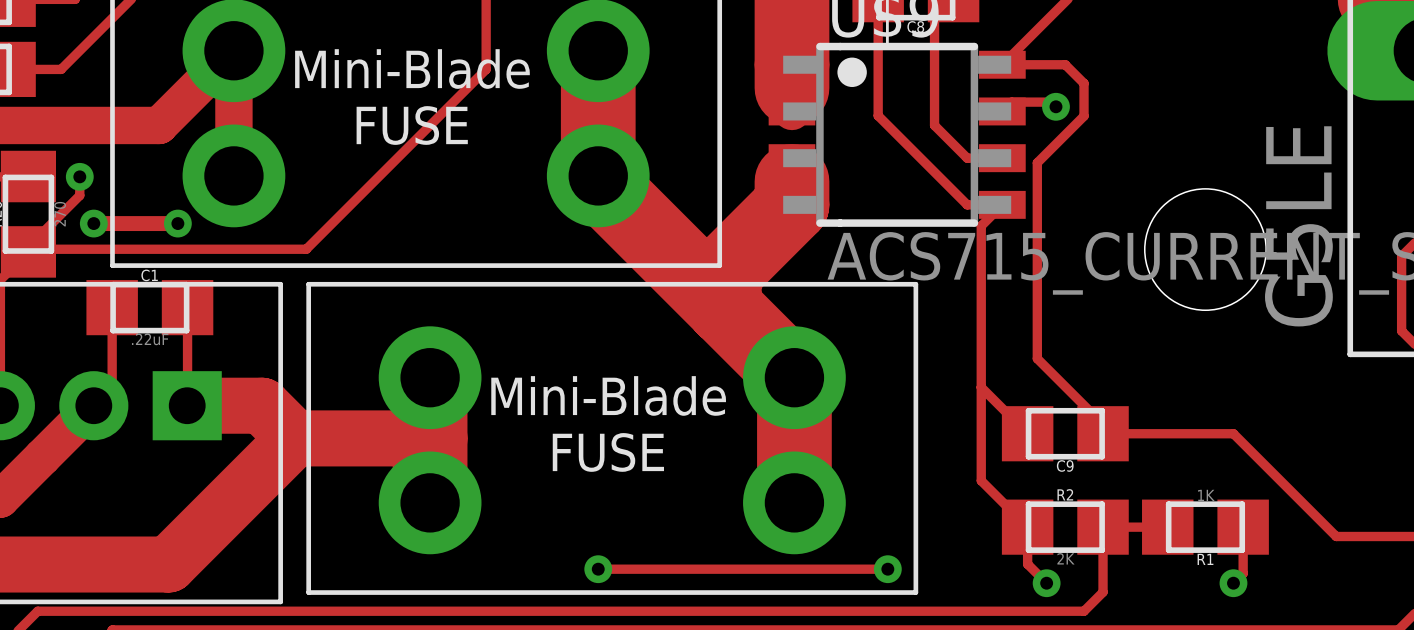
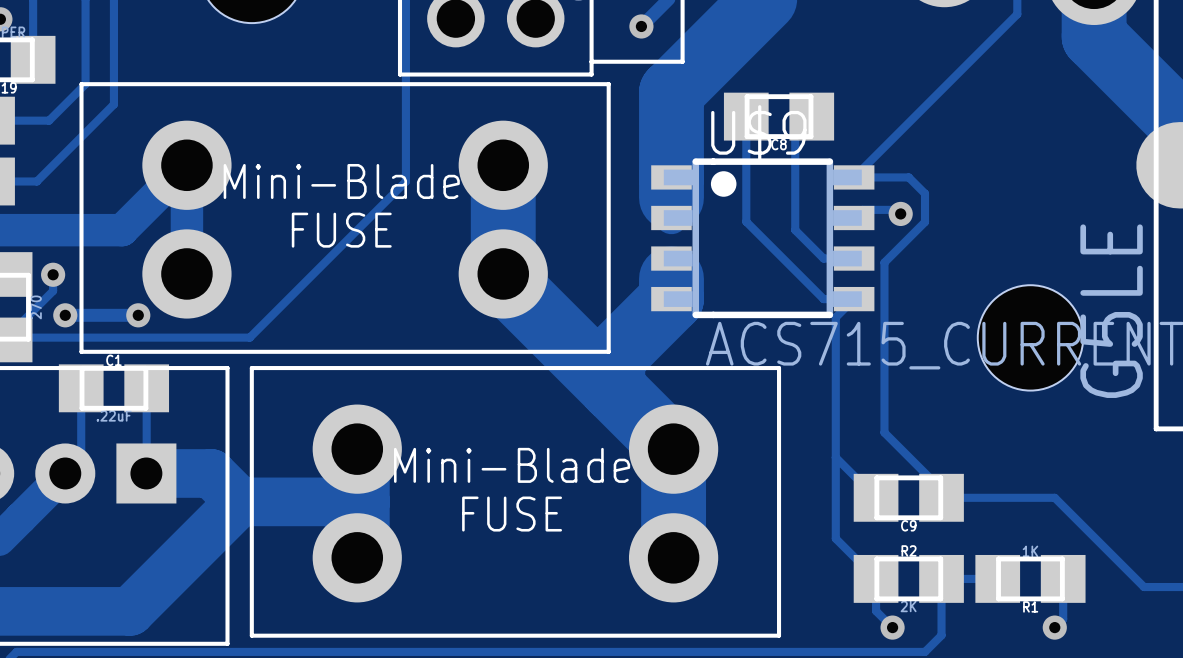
track: (598, 569) (887, 569) -> none
via: (598, 569) -> none
via: (887, 569) -> none

